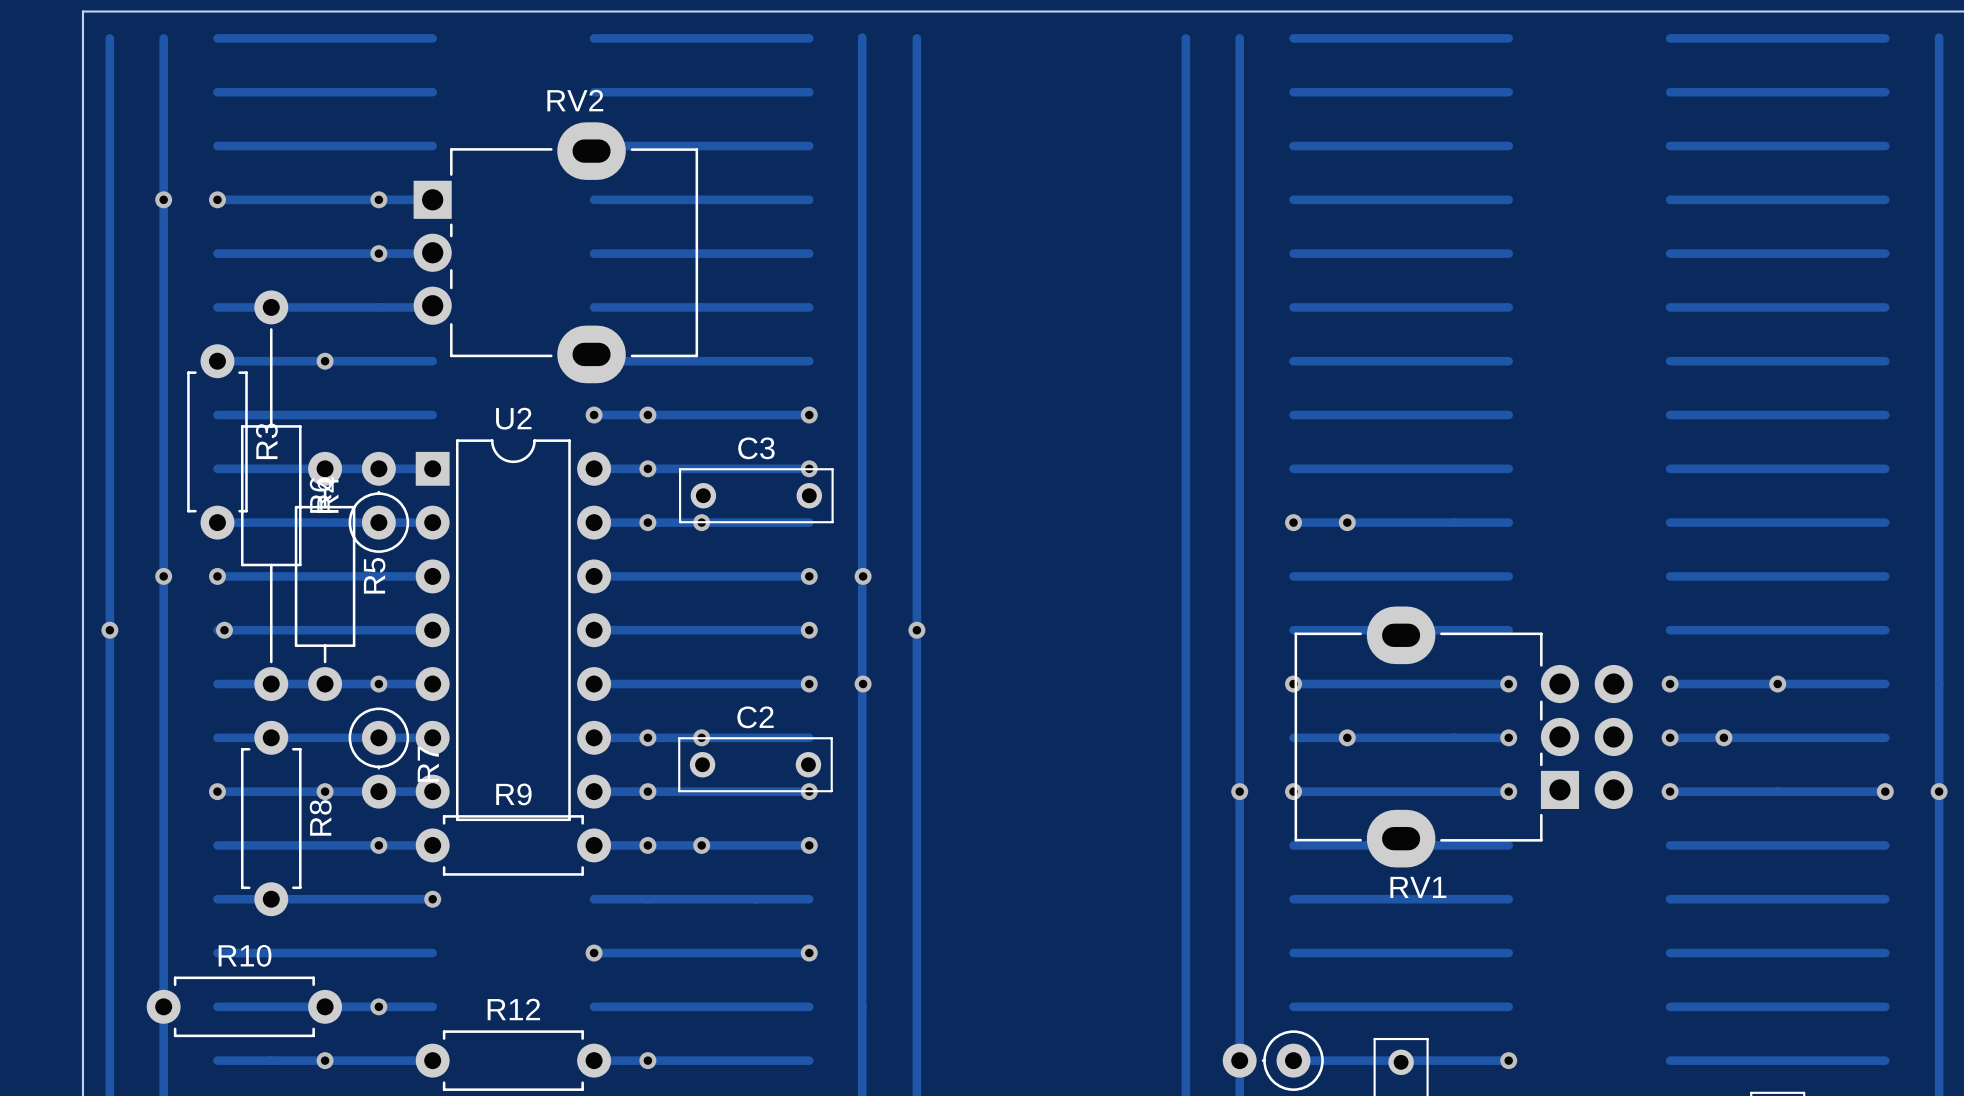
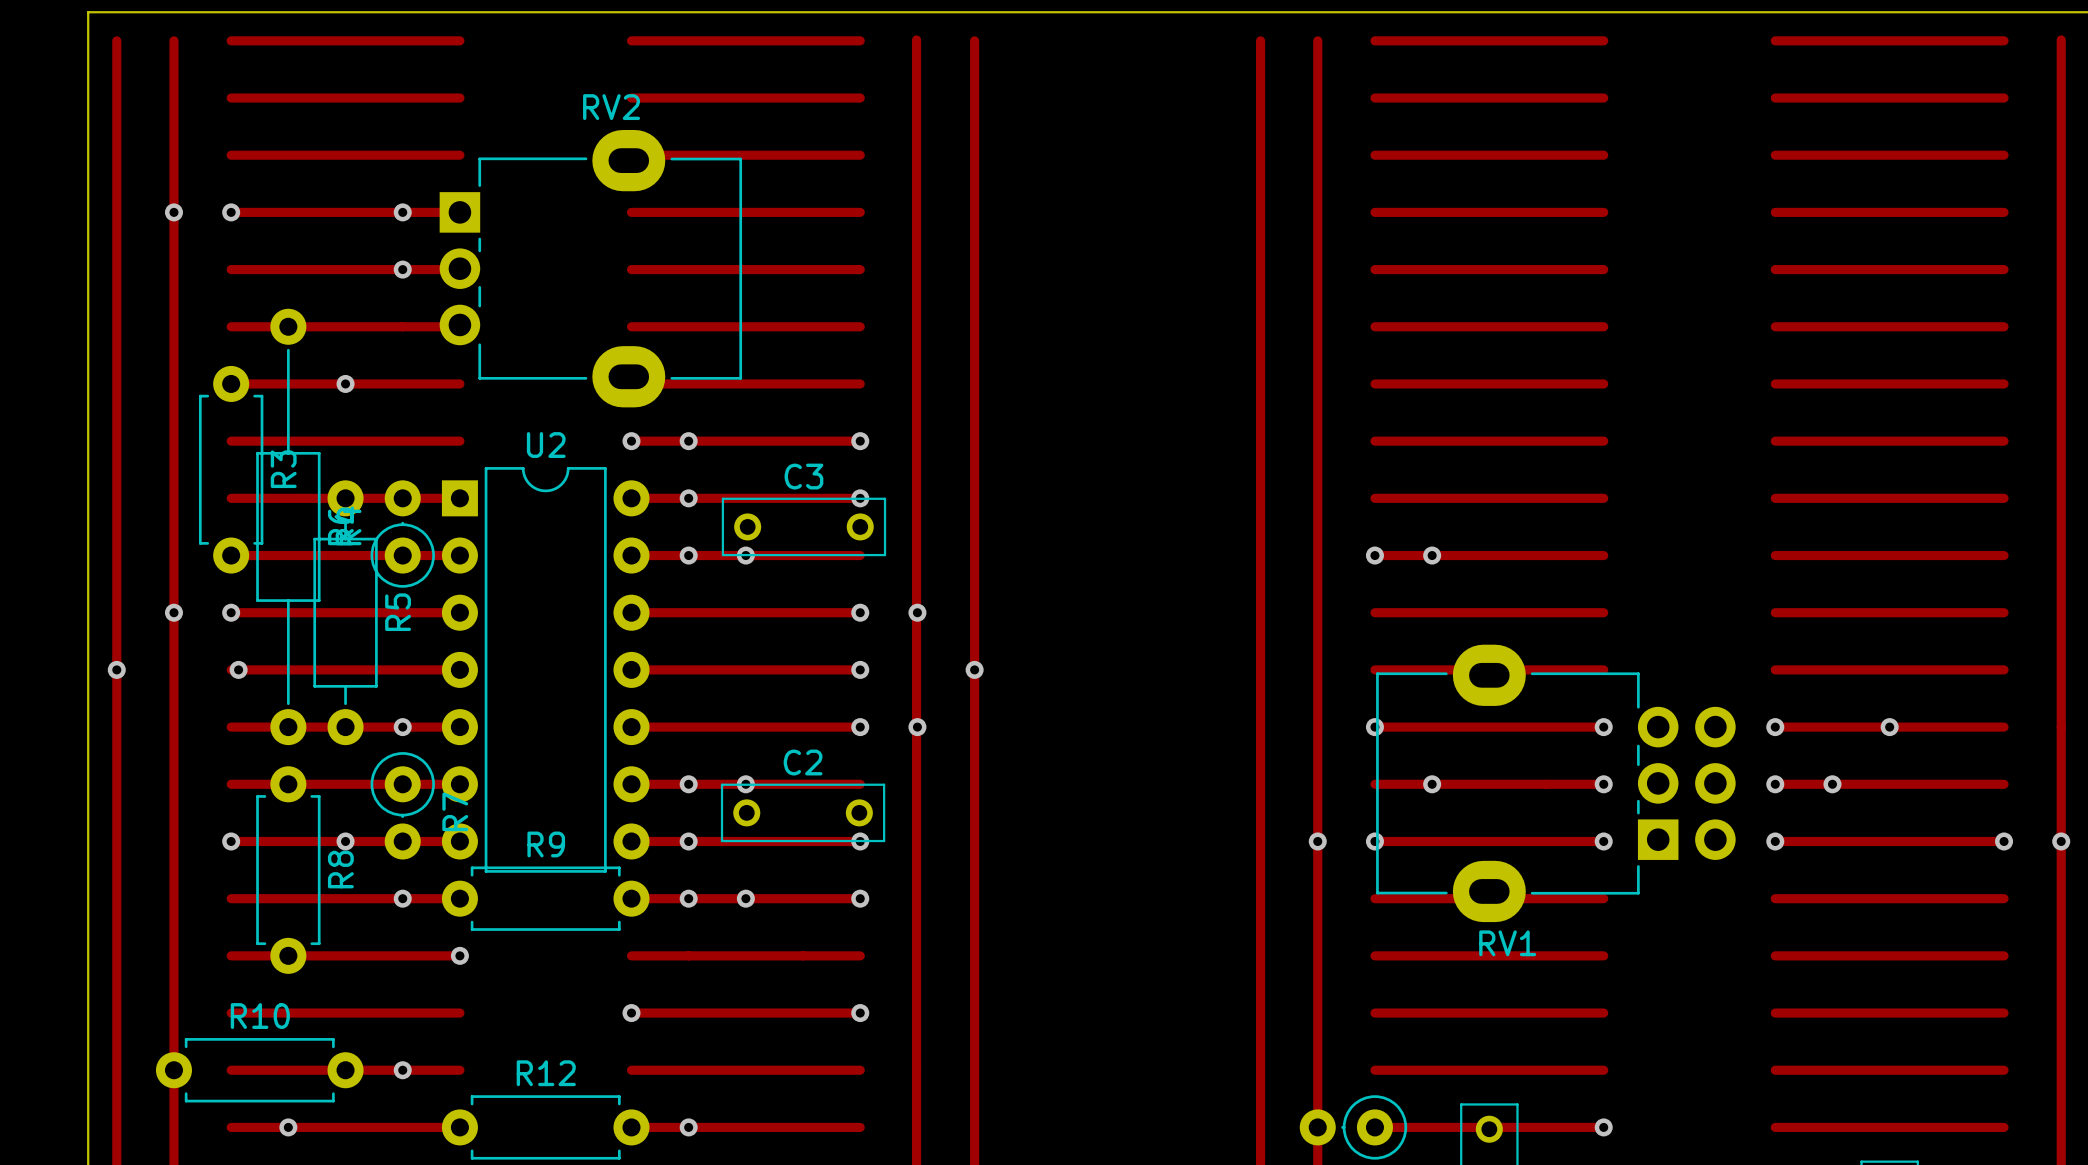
via position: (325, 1060) -> (288, 1127)

